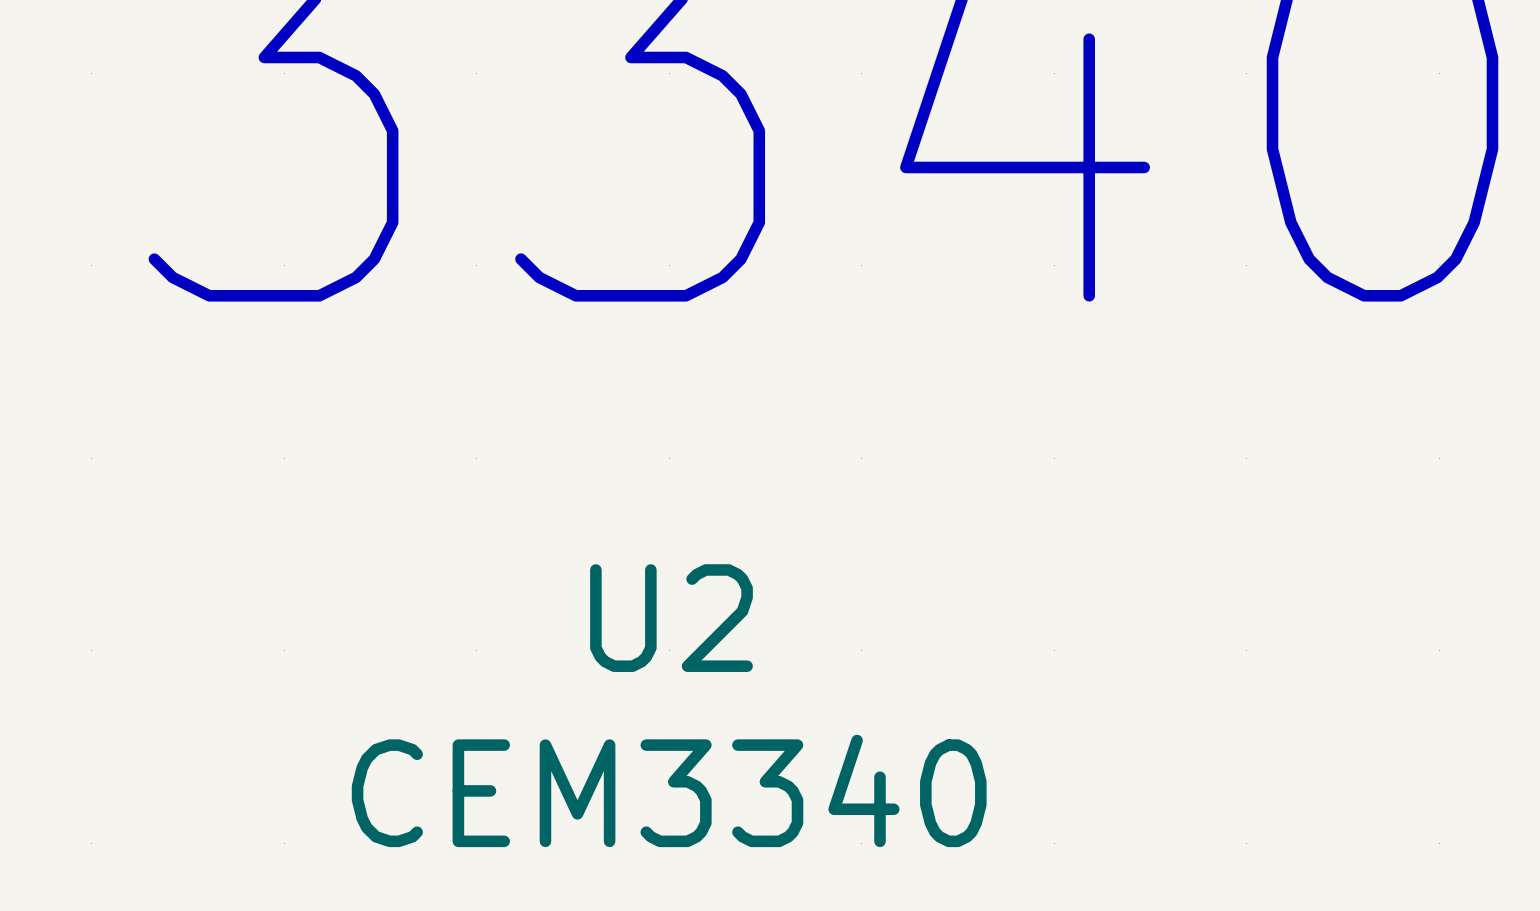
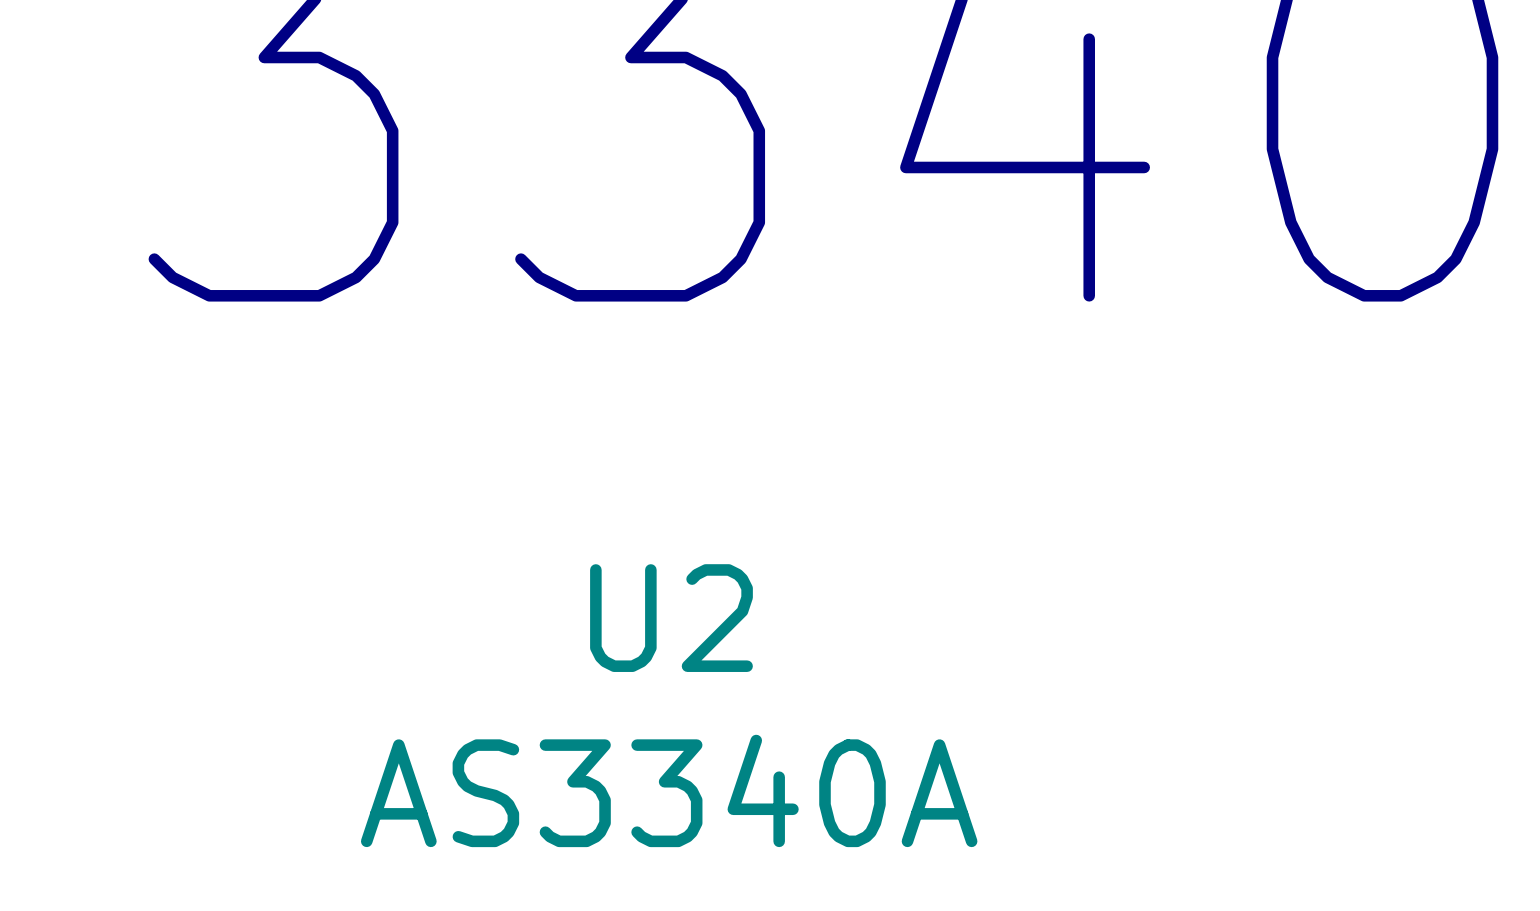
U2 value: CEM3340 (669, 790) -> AS3340A (669, 790)

